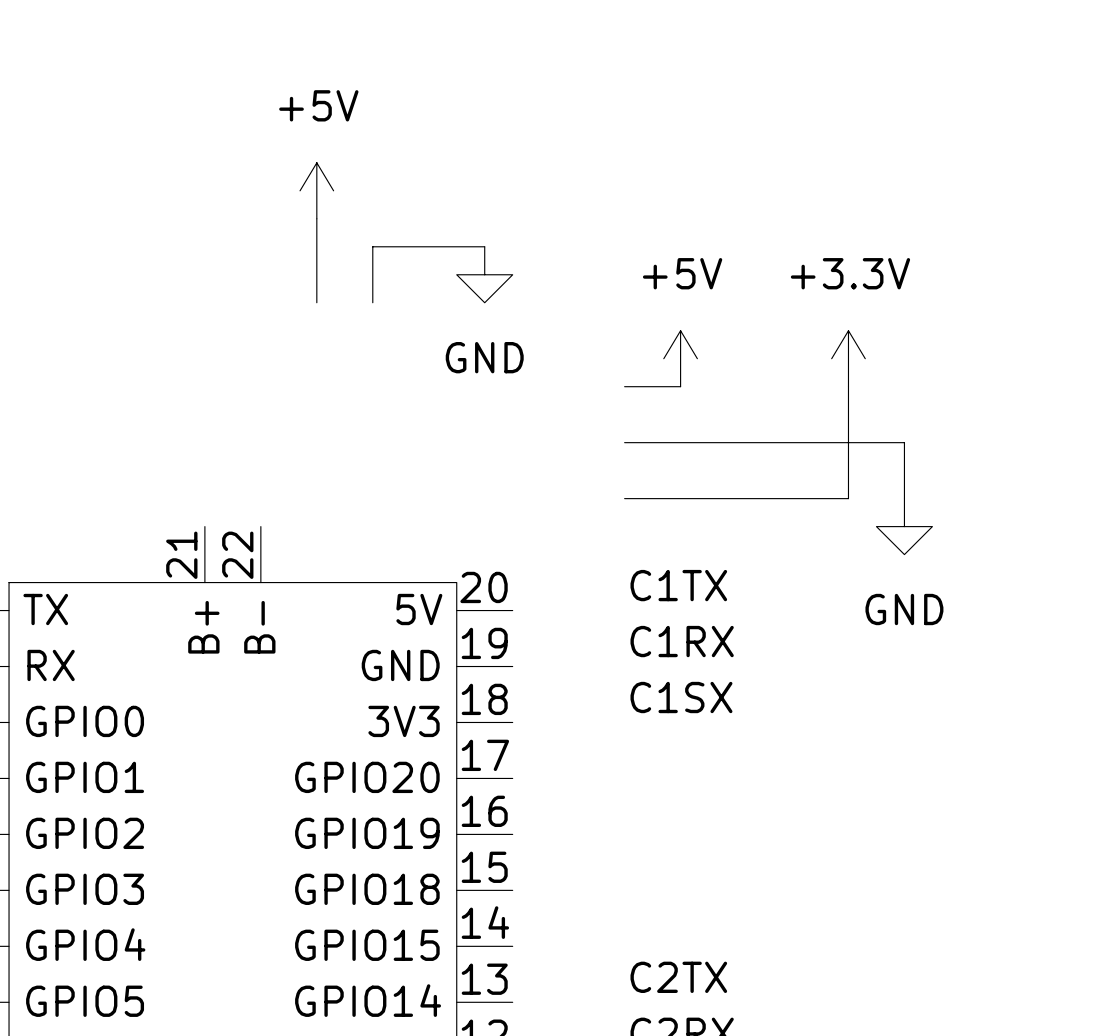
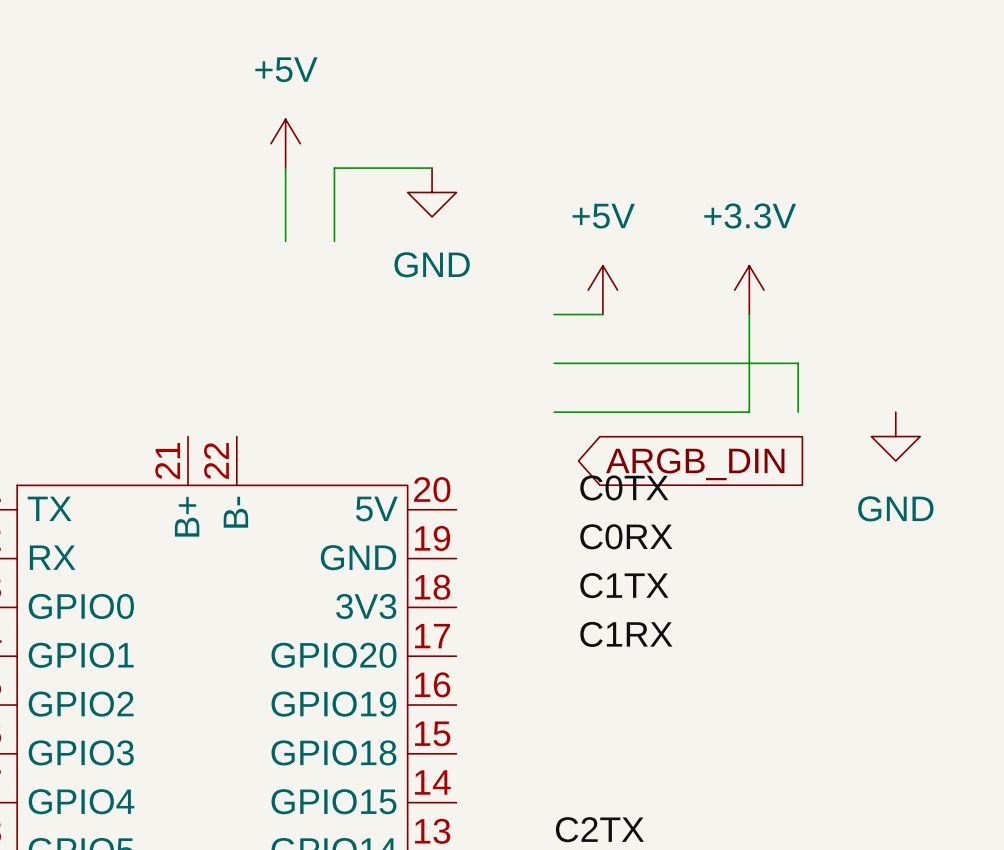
wire: (372, 246) (484, 246) -> (334, 192) (334, 168) (432, 168)
power symbol position: GND (484, 274) -> GND (432, 192)
power symbol position: GND (904, 526) -> GND (895, 436)
global label: none -> ARGB_DIN (695, 464)
label position: C1TX (678, 585) -> C1TX (624, 585)
label: none -> C0TX (624, 487)
label position: C1RX (682, 641) -> C1RX (626, 634)
label: none -> C0RX (626, 536)
label: C1SX (681, 697) -> none

